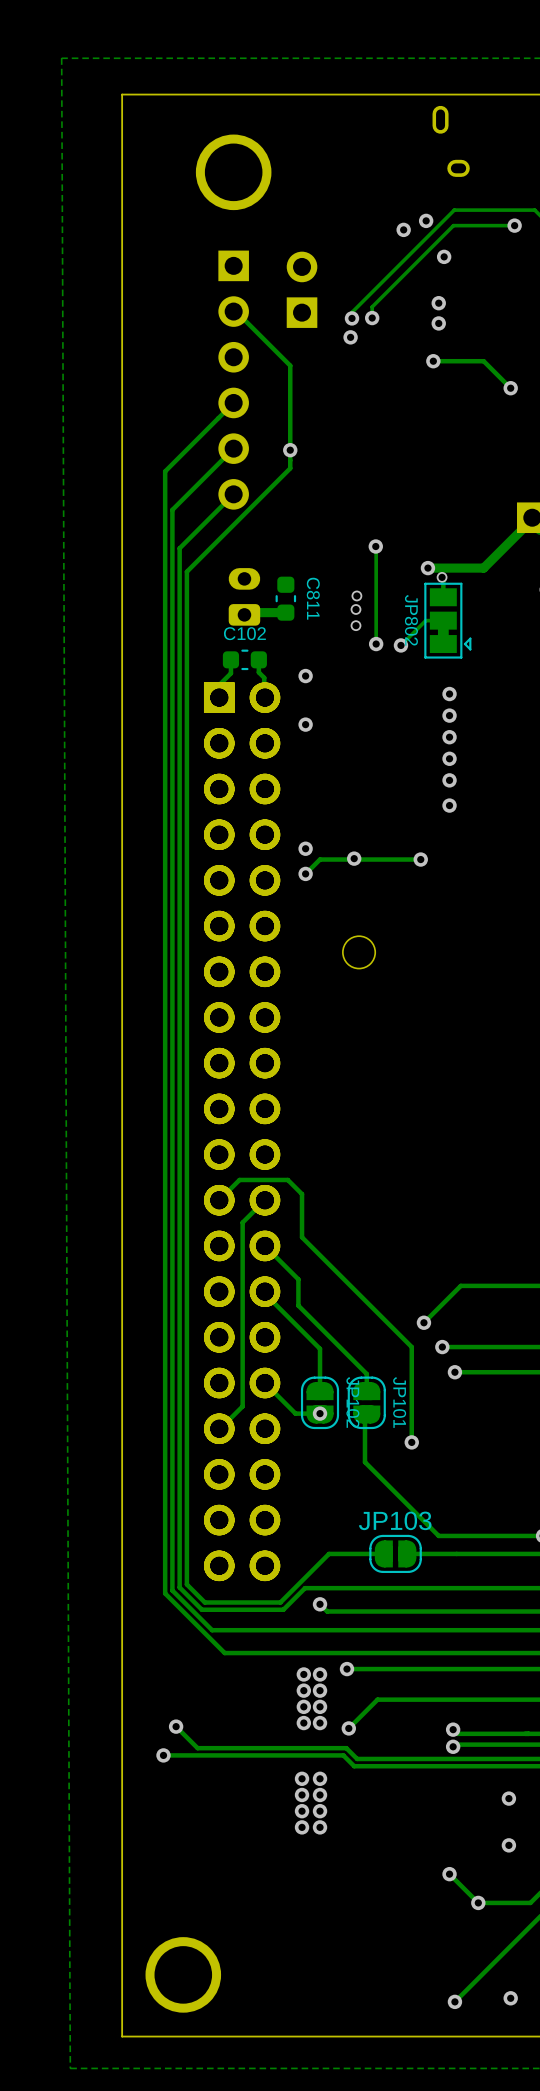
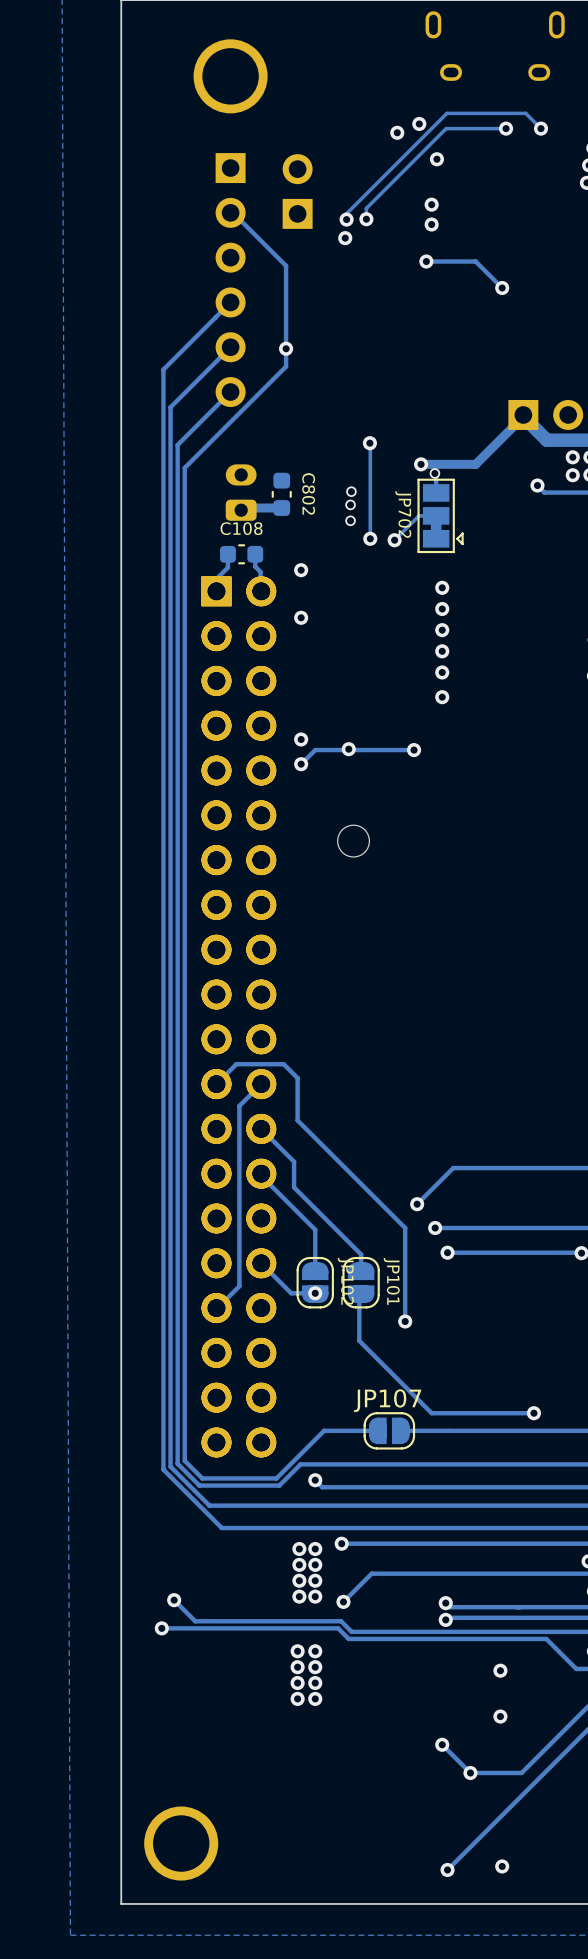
C811 name: C811 (313, 598) -> C802 (308, 493)
JP802 name: JP802 (411, 620) -> JP702 (403, 514)
C102 name: C102 (244, 633) -> C108 (241, 528)
JP103 name: JP103 (395, 1520) -> JP107 (387, 1400)

